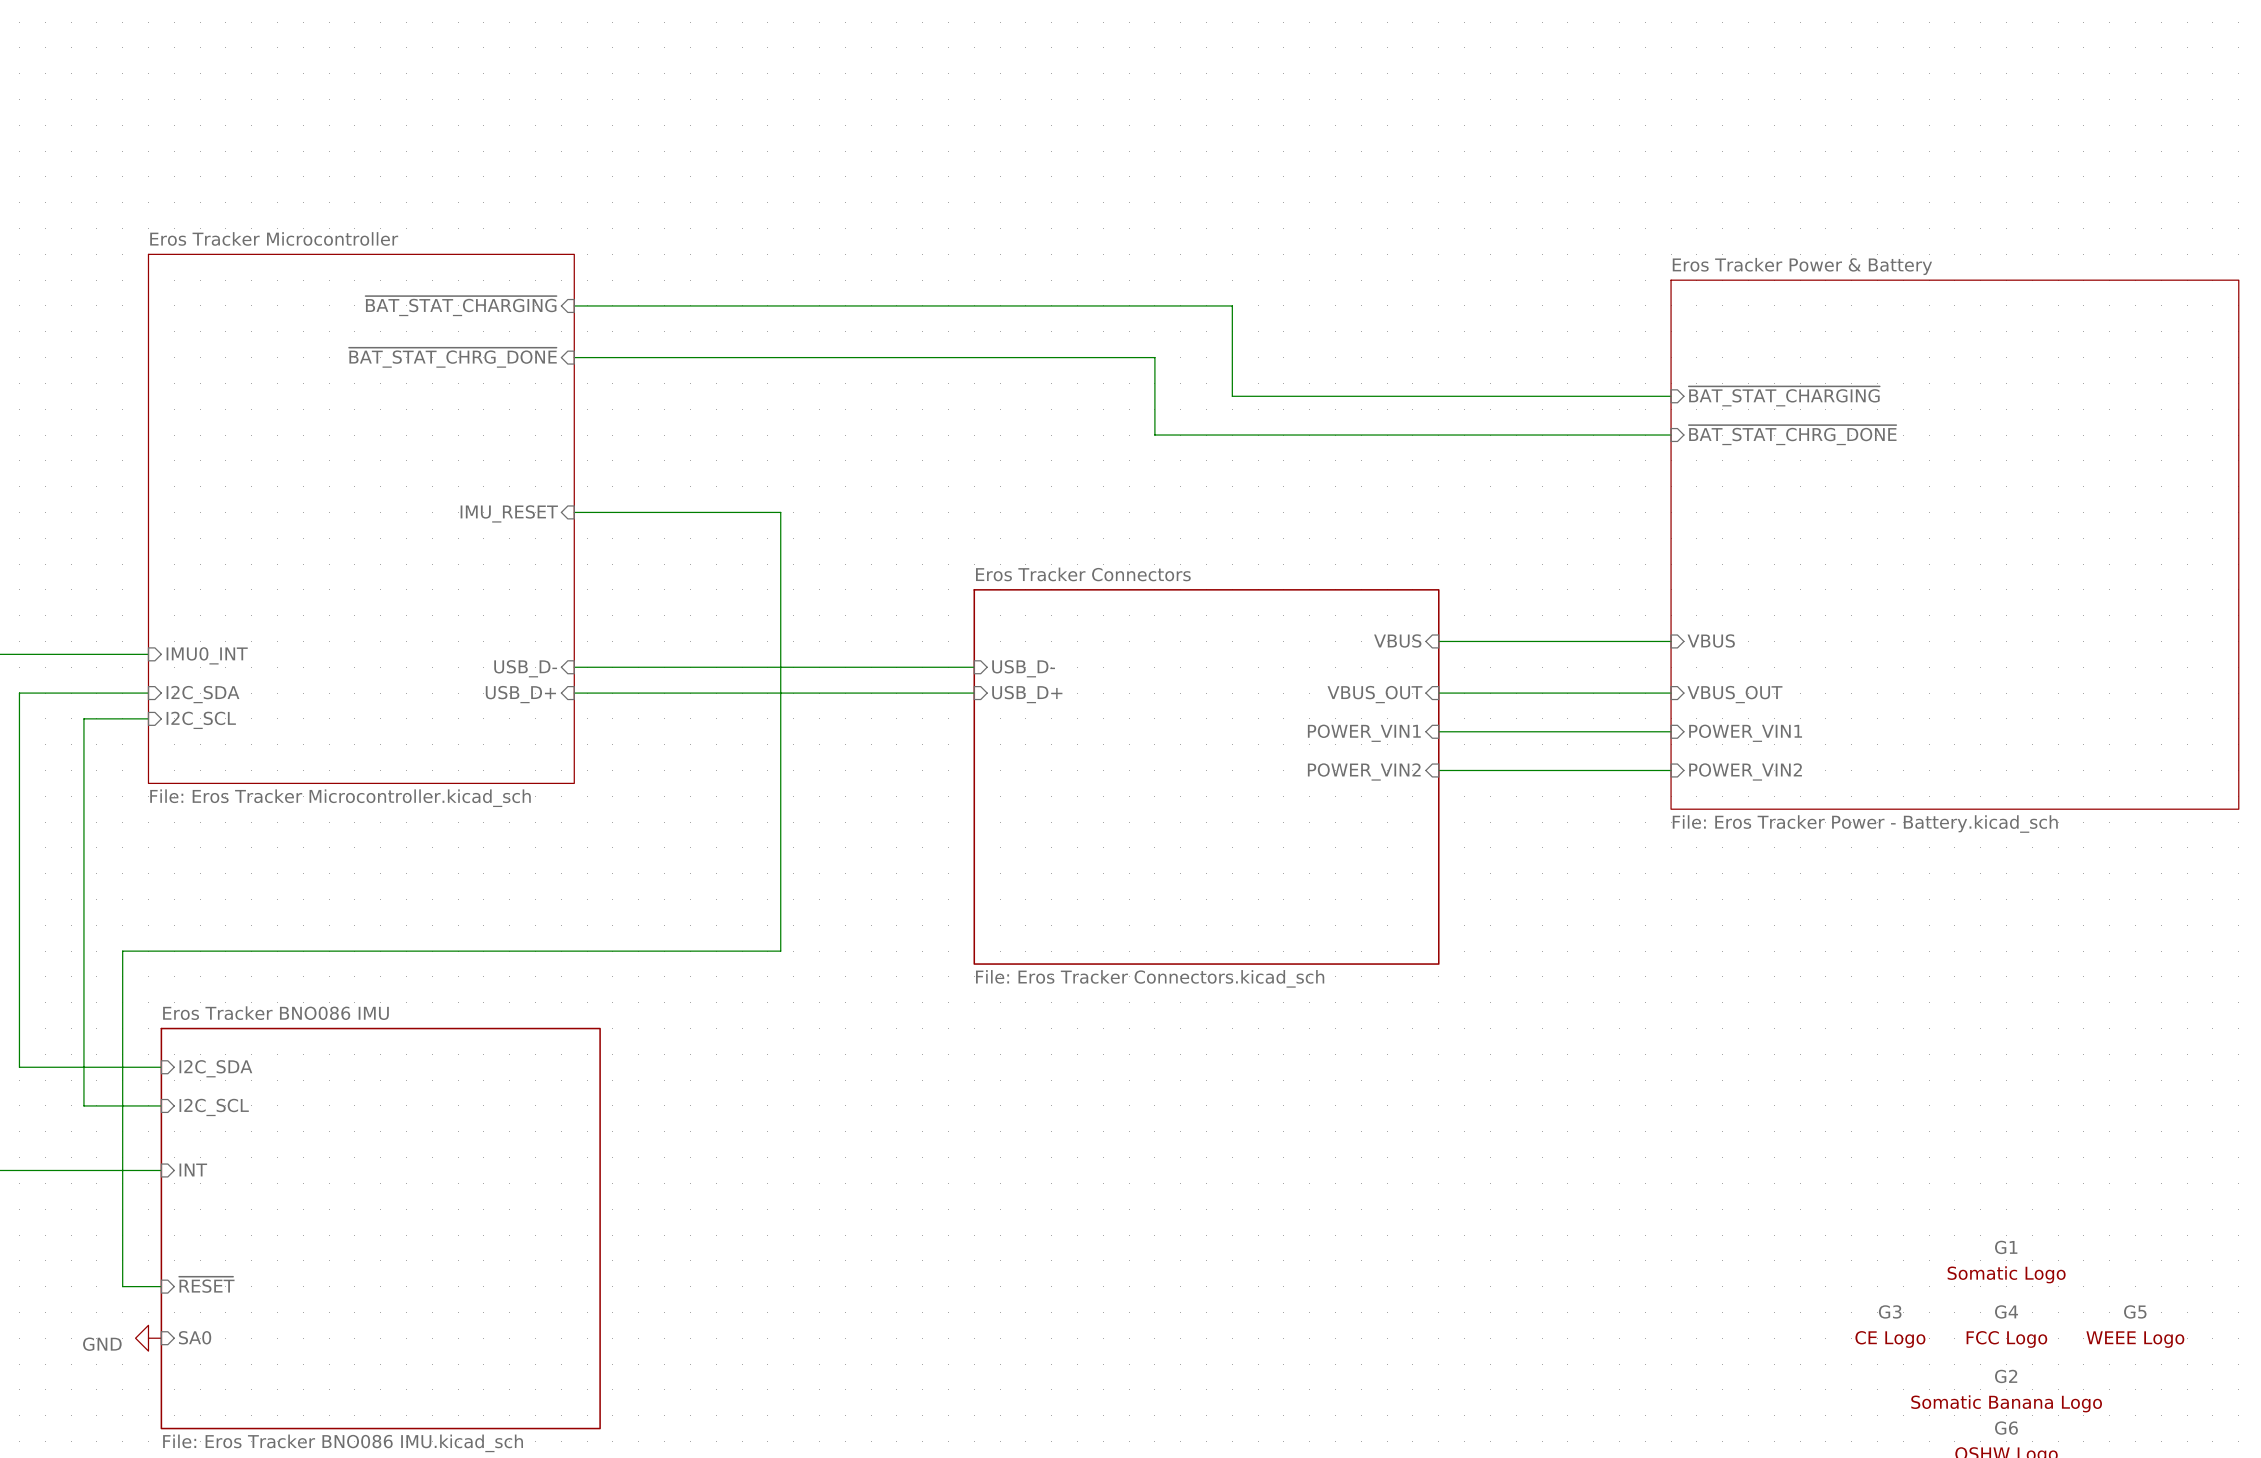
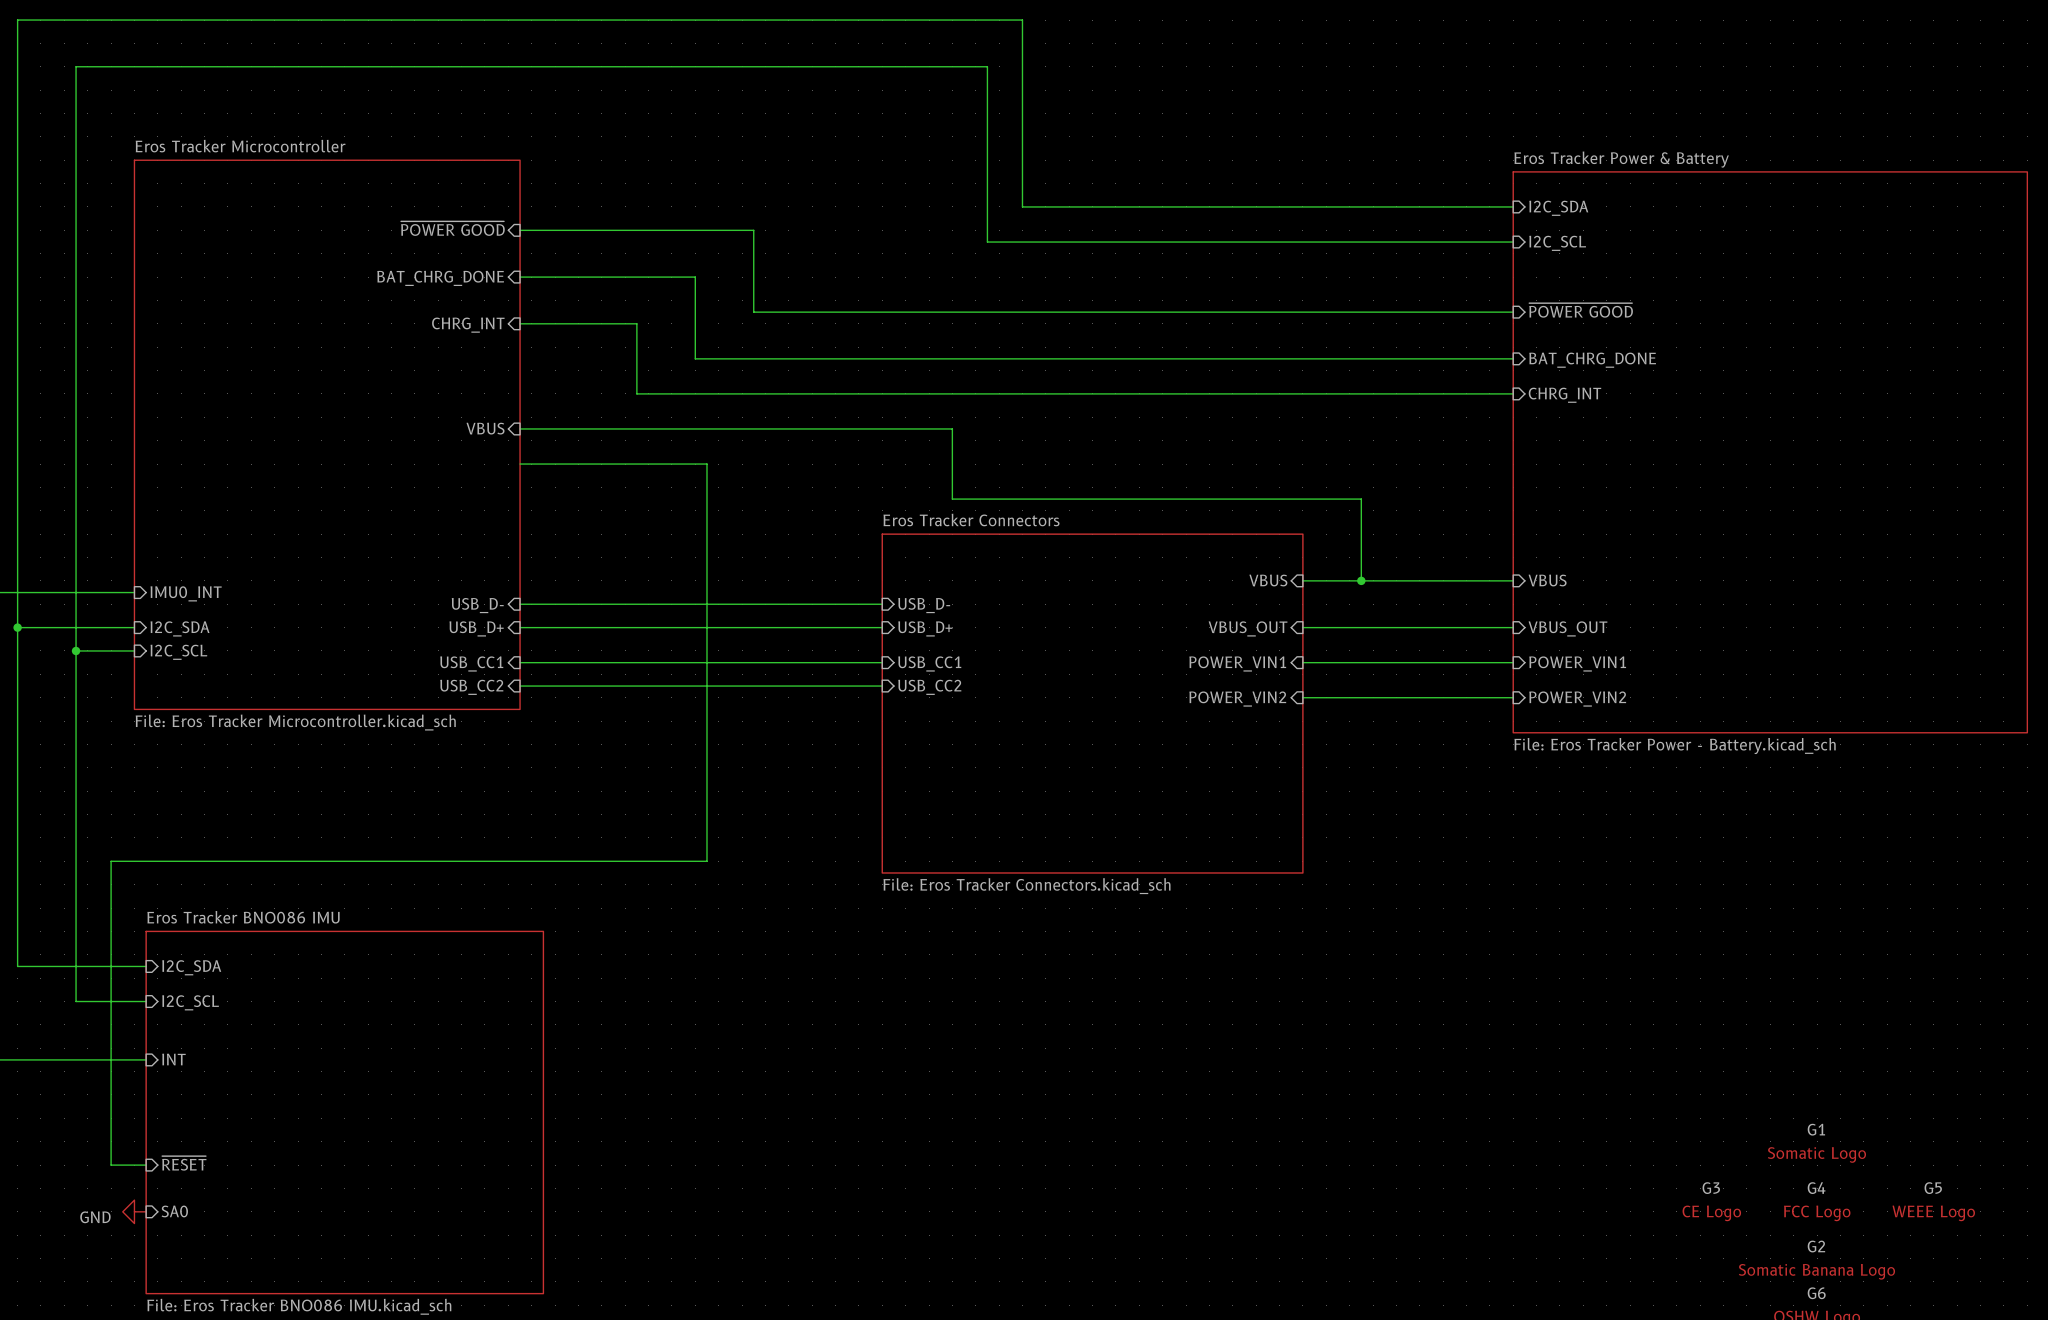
wire: none -> (1513, 206) (1022, 206) (1022, 20) (17, 20) (17, 627)
sheet pin: none -> I2C_SDA (1558, 208)
sheet pin: none -> ~{POWER GOOD} (452, 228)
wire: none -> (520, 230) (753, 230) (753, 312) (1513, 312)
wire: none -> (1513, 242) (987, 242) (987, 66) (76, 66) (76, 650)
sheet pin: none -> I2C_SCL (1557, 243)
wire: (767, 305) (1232, 305) (1232, 396) -> (695, 277) (695, 358) (1115, 358)
sheet pin: ~{BAT_STAT_CHARGING} (461, 306) -> BAT_CHRG_DONE (440, 278)
sheet pin: none -> ~{POWER GOOD} (1581, 310)
sheet pin: ~{BAT_STAT_CHRG_DONE} (452, 357) -> CHRG_INT (468, 325)
wire: (703, 357) (1154, 357) (1154, 435) -> (636, 323) (636, 393) (1045, 393)
sheet pin: ~{BAT_STAT_CHARGING} (1784, 396) -> BAT_CHRG_DONE (1592, 360)
sheet pin: ~{BAT_STAT_CHRG_DONE} (1792, 435) -> CHRG_INT (1564, 395)
sheet pin: none -> VBUS (485, 428)
wire: none -> (520, 428) (952, 428) (952, 499) (1361, 499) (1361, 580)
sheet Eros Tracker Microcontroller: none -> File: Eros Tracker Microcontroller.kicad_sch (327, 434)
sheet Eros Tracker Power & Battery: none -> File: Eros Tracker Power - Battery.kicad_sch (1770, 452)
sheet pin: IMU_RESET (509, 513) -> none
sheet Eros Tracker Microcontroller: File: Eros Tracker Microcontroller.kicad_sch (361, 518) -> none
sheet Eros Tracker Power & Battery: File: Eros Tracker Power - Battery.kicad_sch (1954, 544) -> none
junction: none -> (1361, 580)
junction: none -> (17, 627)
junction: none -> (76, 650)
wire: none -> (520, 662) (882, 662)
sheet pin: none -> USB_CC1 (471, 663)
sheet pin: none -> USB_CC1 (929, 663)
wire: none -> (520, 686) (882, 686)
sheet pin: none -> USB_CC2 (471, 687)
sheet pin: none -> USB_CC2 (929, 687)

